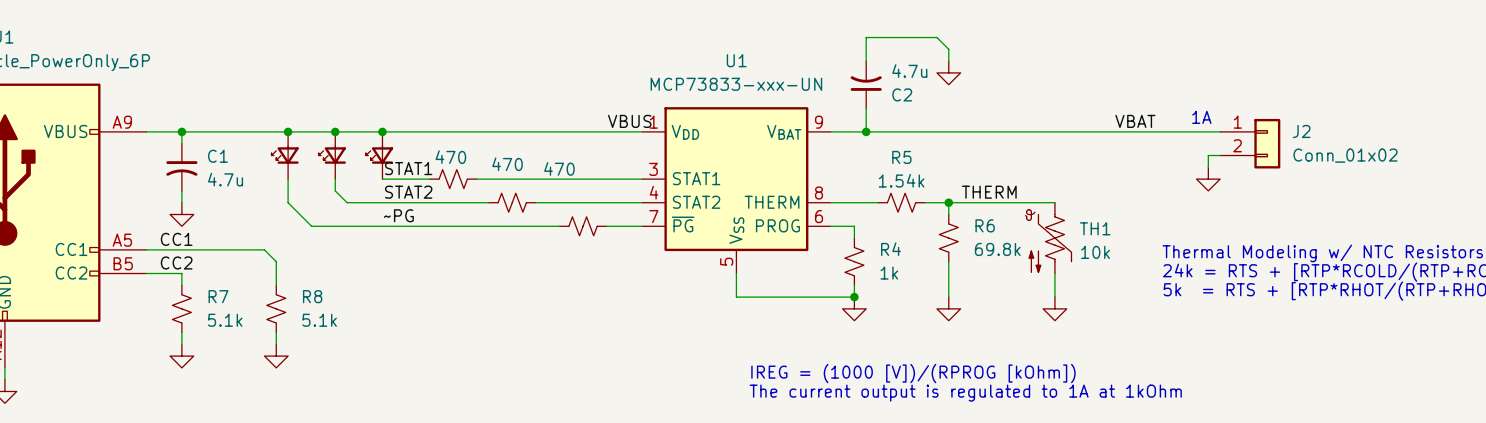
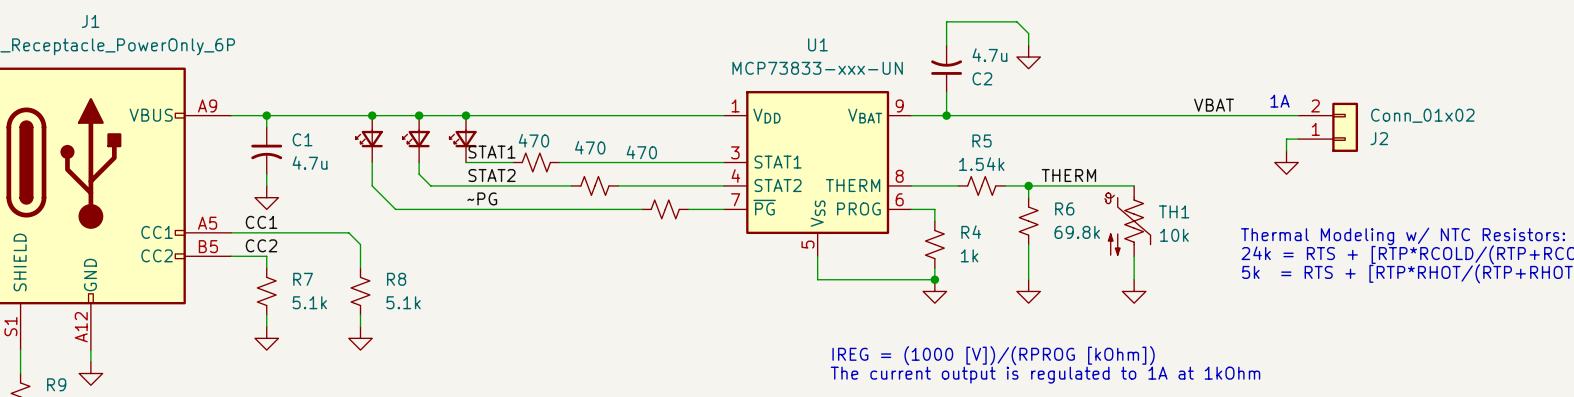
label: VBUS (629, 121) -> none
J2 flip: as is (1267, 143) -> up-down (1345, 127)

